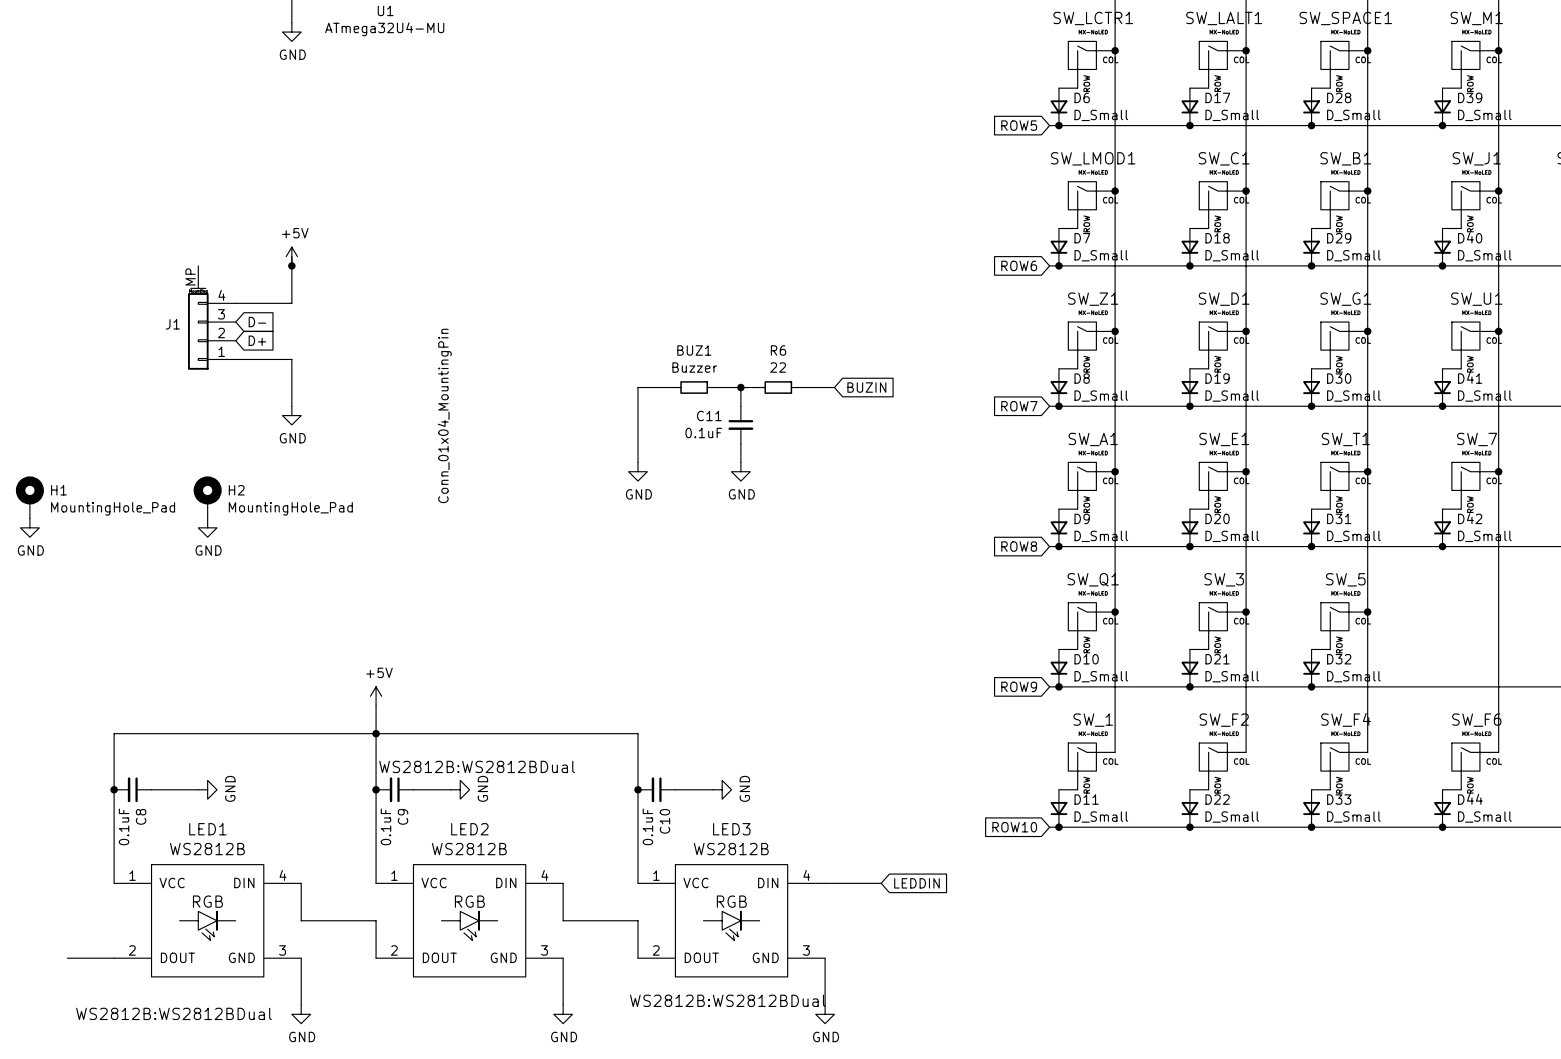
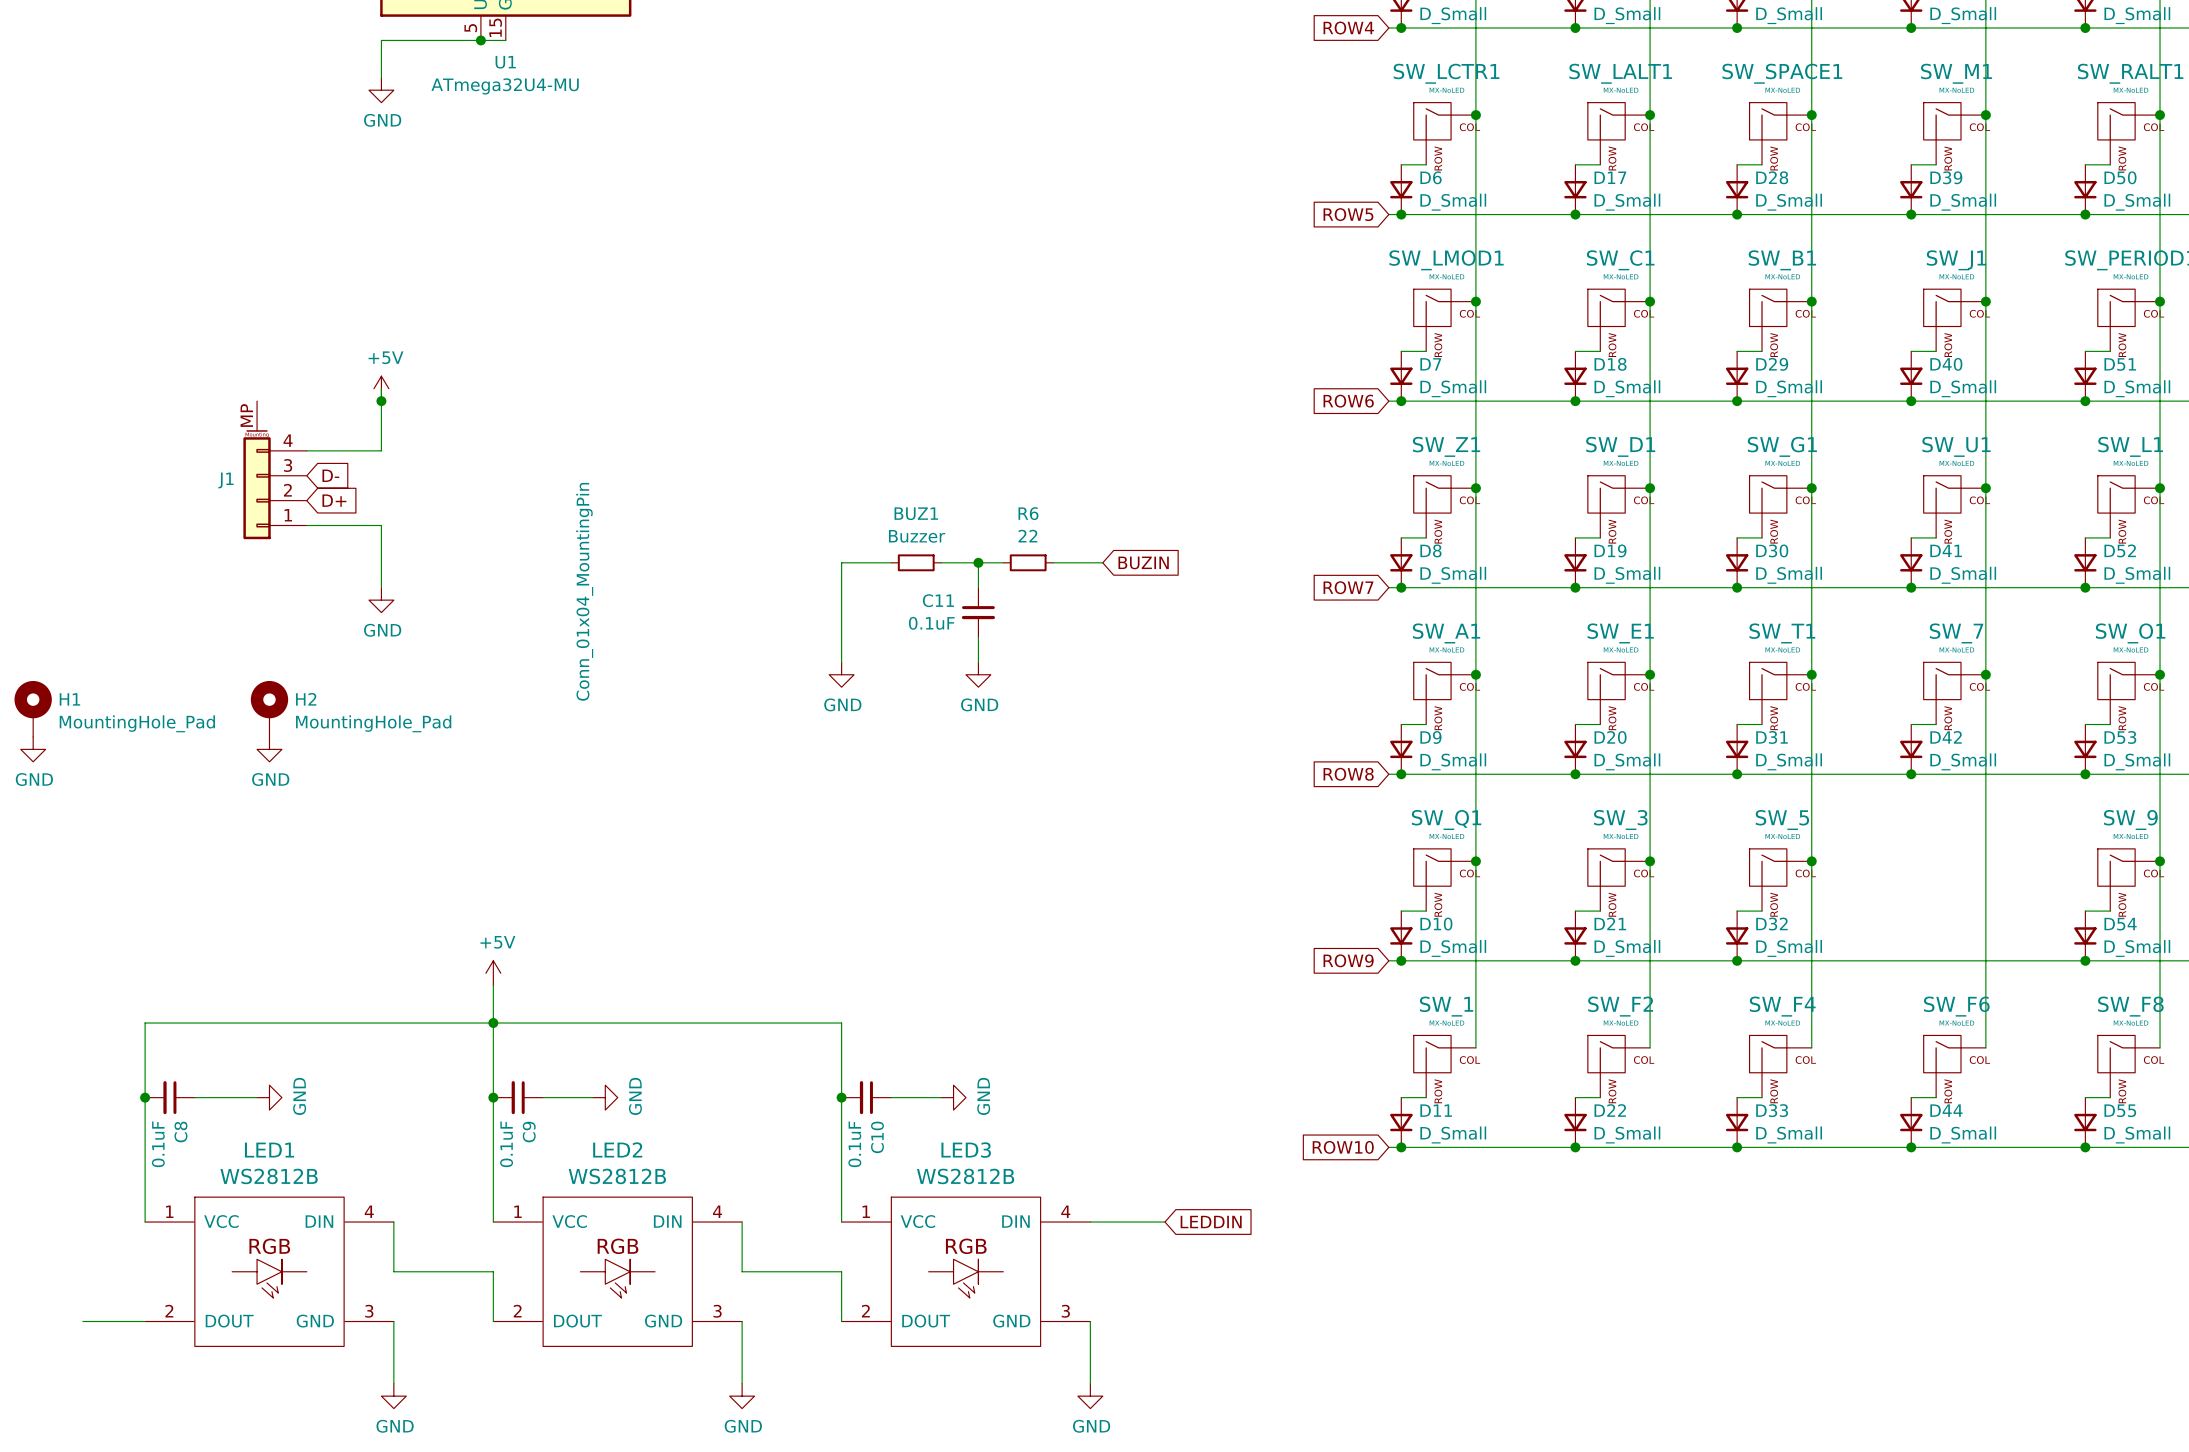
LED2 text: WS2812B:WS2812BDual (477, 766) -> none
LED3 text: WS2812B:WS2812BDual (727, 1000) -> none
LED1 text: WS2812B:WS2812BDual (173, 1013) -> none

